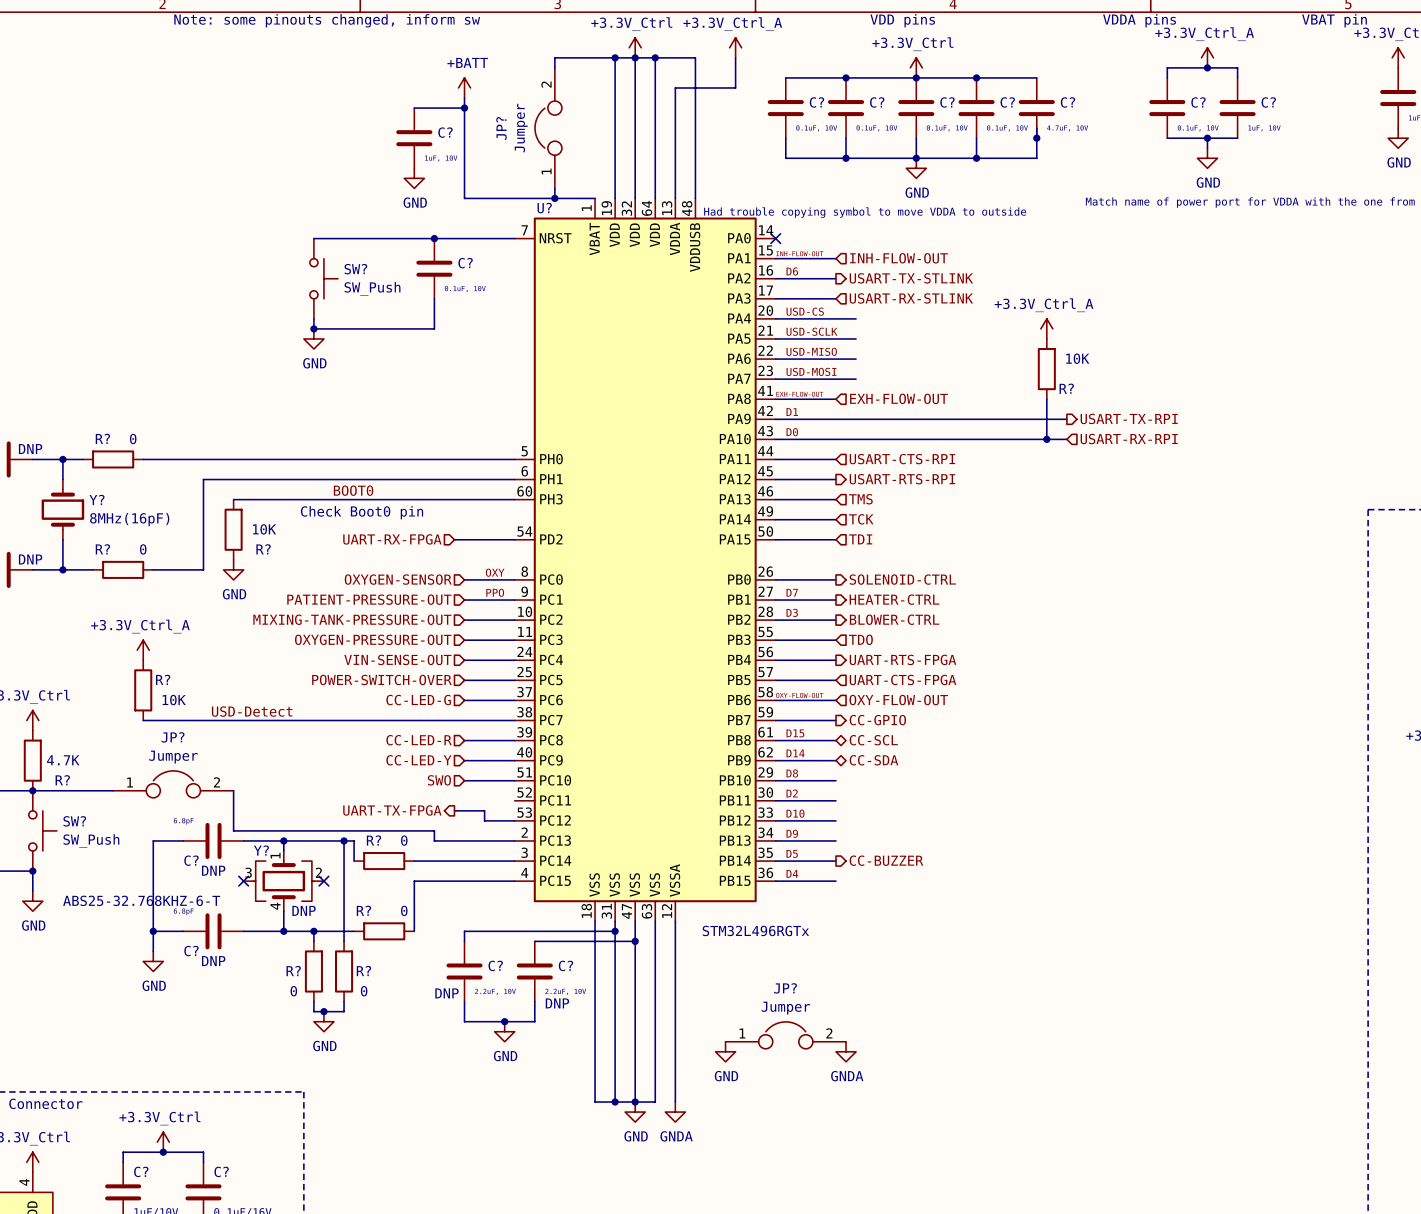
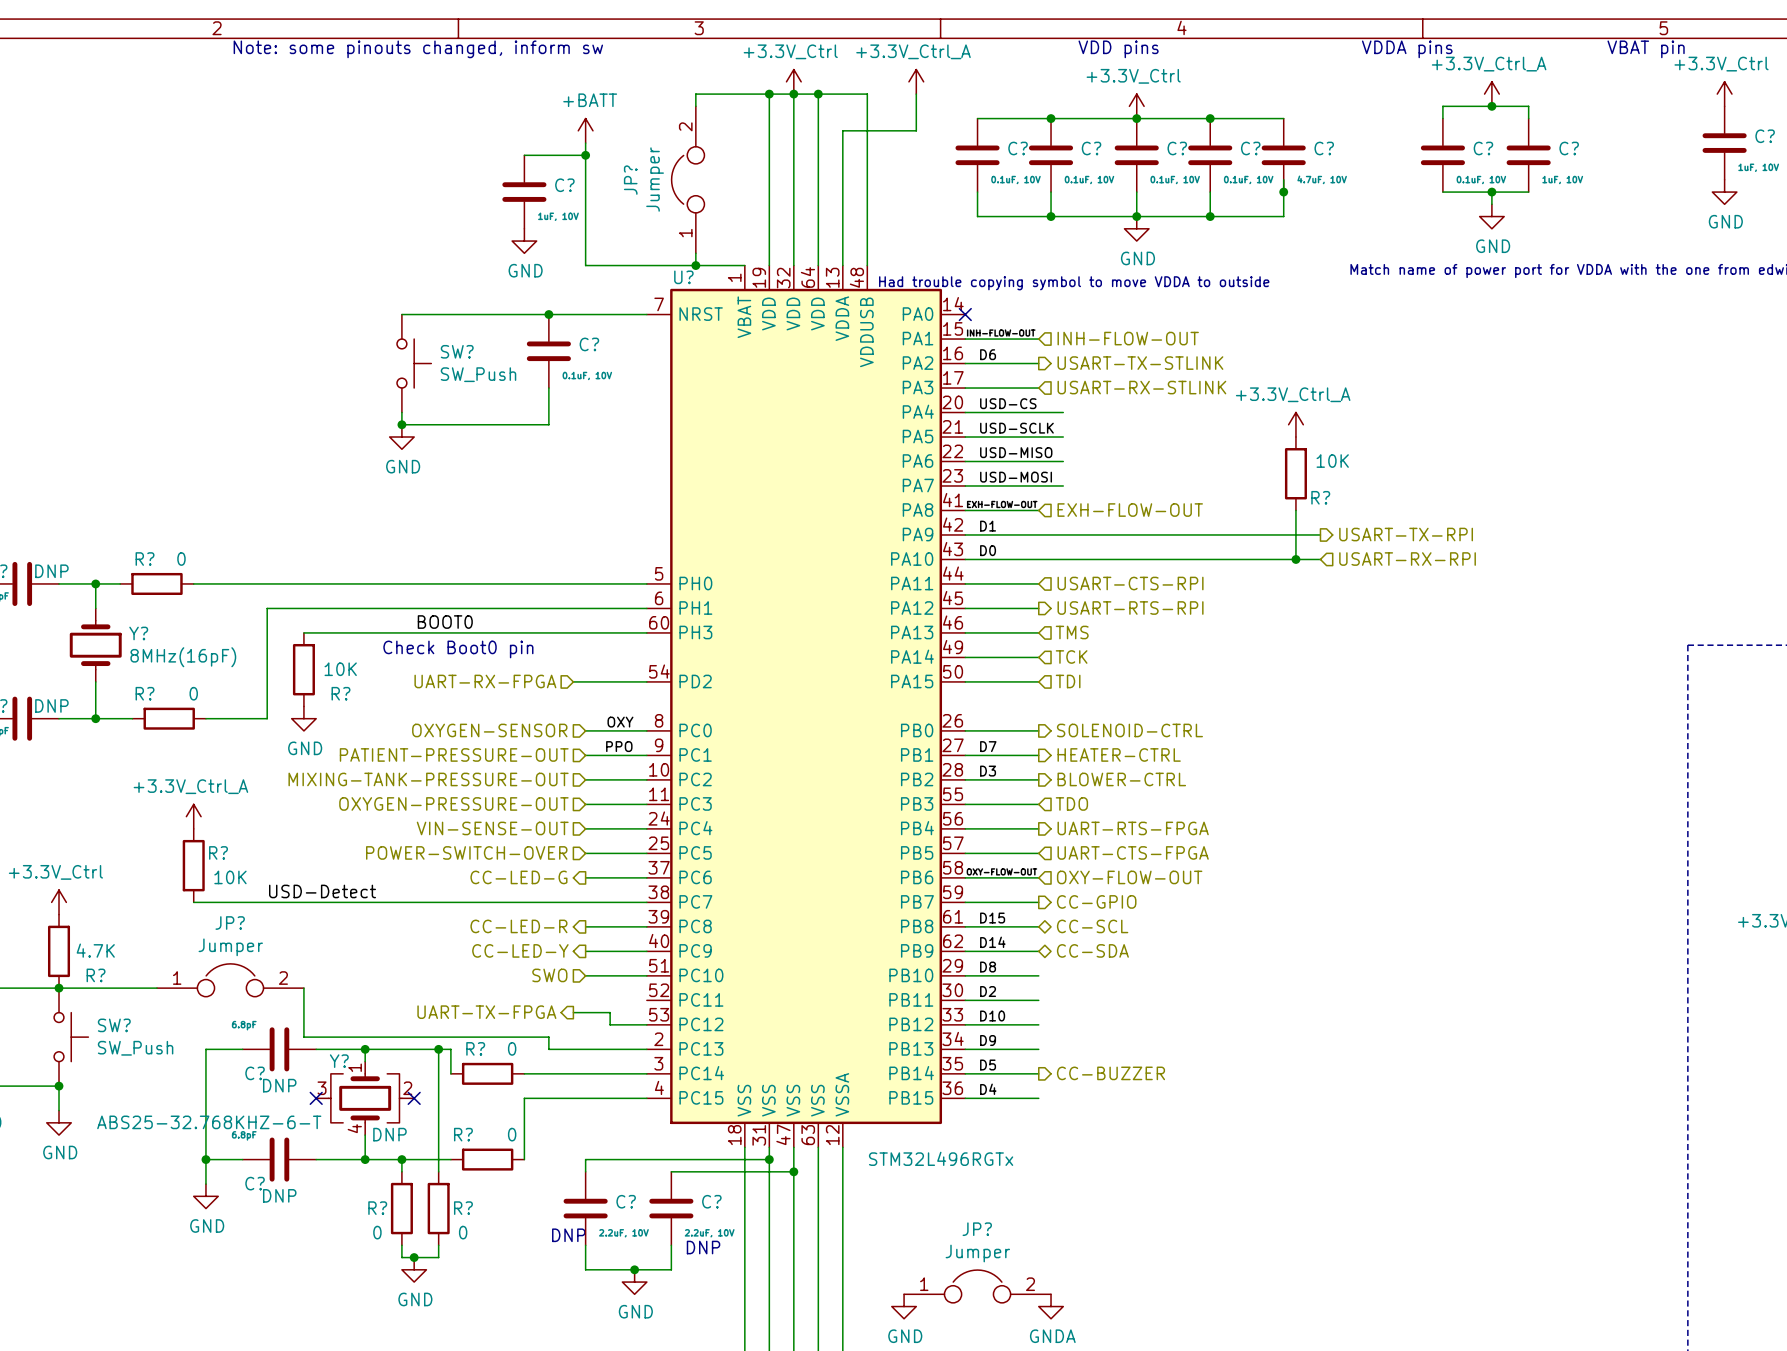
hierarchical label shape: input (418, 700) -> output (518, 877)
hierarchical label shape: input (419, 740) -> output (518, 926)
hierarchical label shape: input (418, 760) -> output (520, 950)

